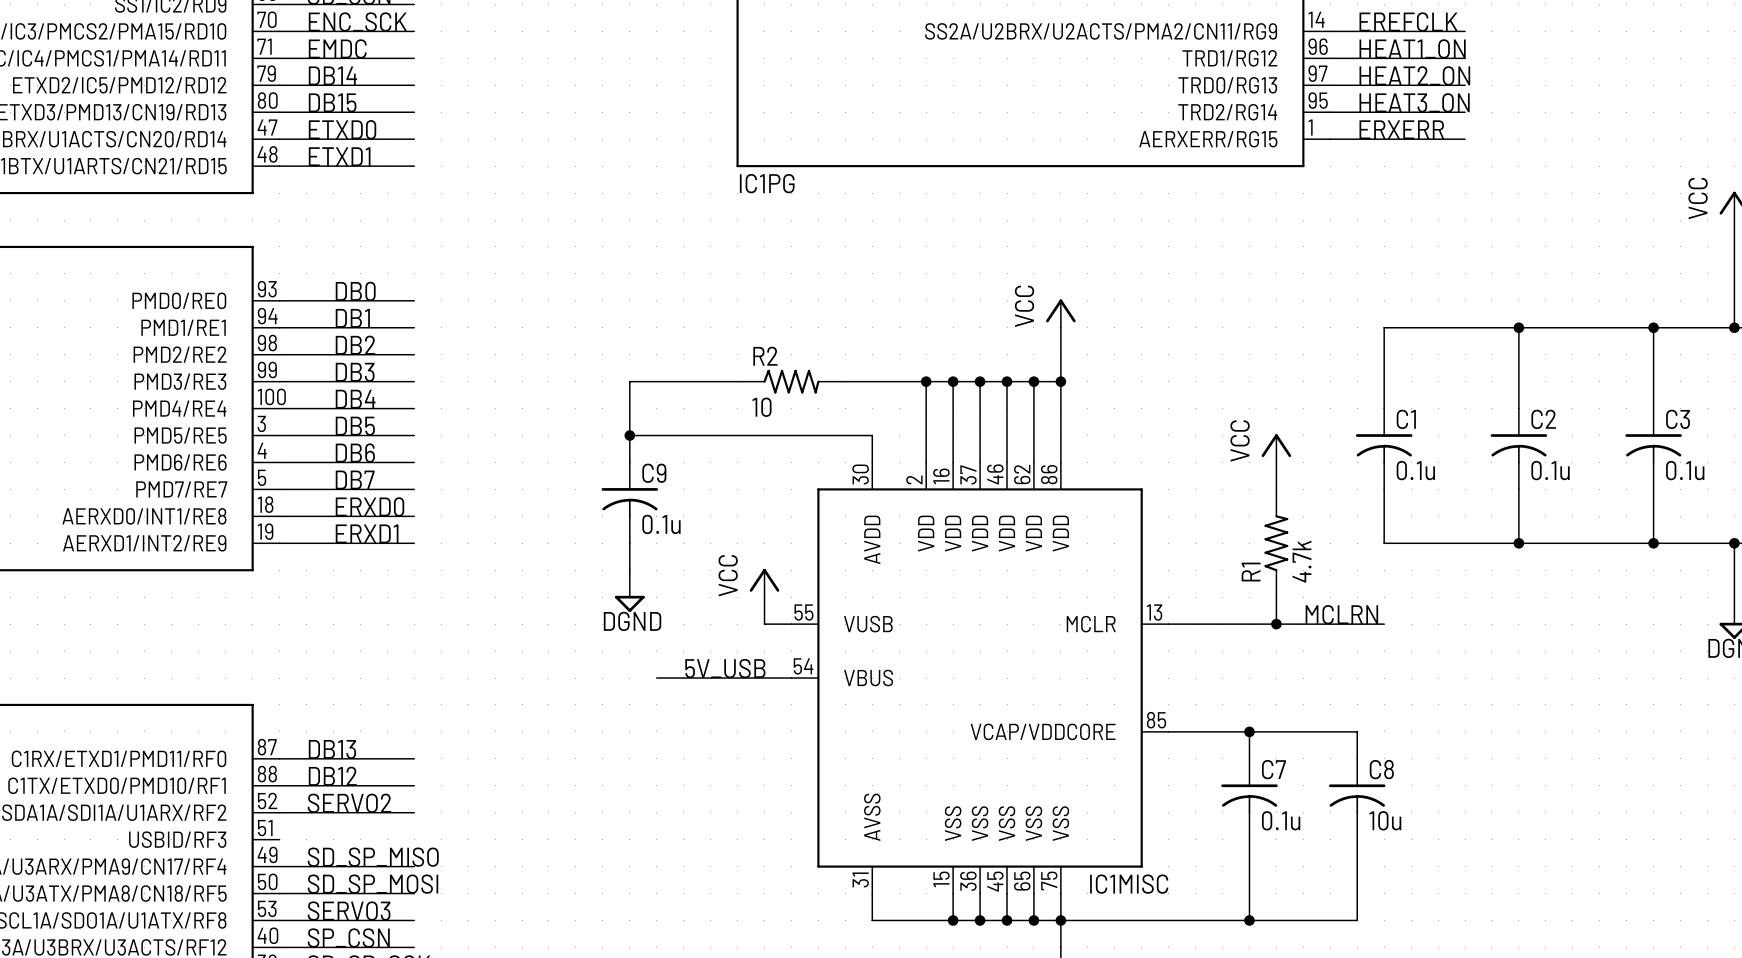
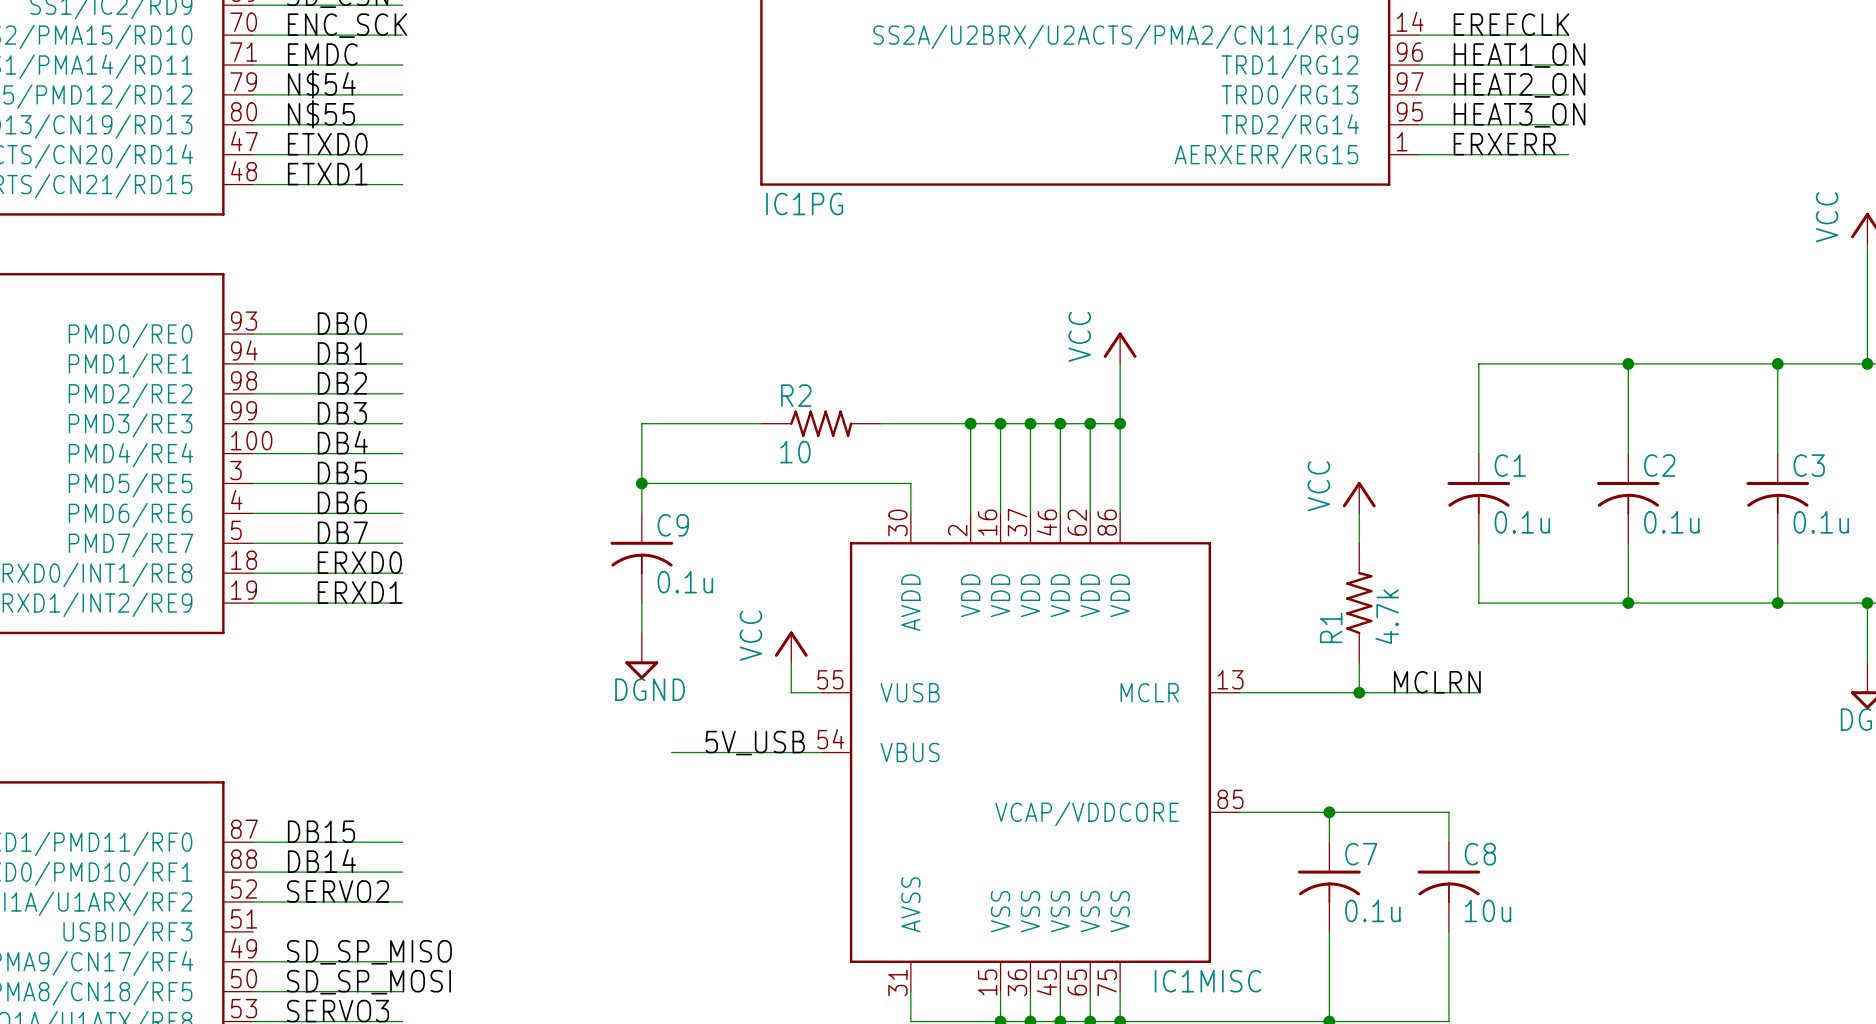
label: DB14 (332, 75) -> N$54 (321, 84)
label: DB15 (332, 102) -> N$55 (321, 114)
label: DB13 (332, 749) -> DB15 (321, 831)
label: DB12 (332, 776) -> DB14 (321, 861)

